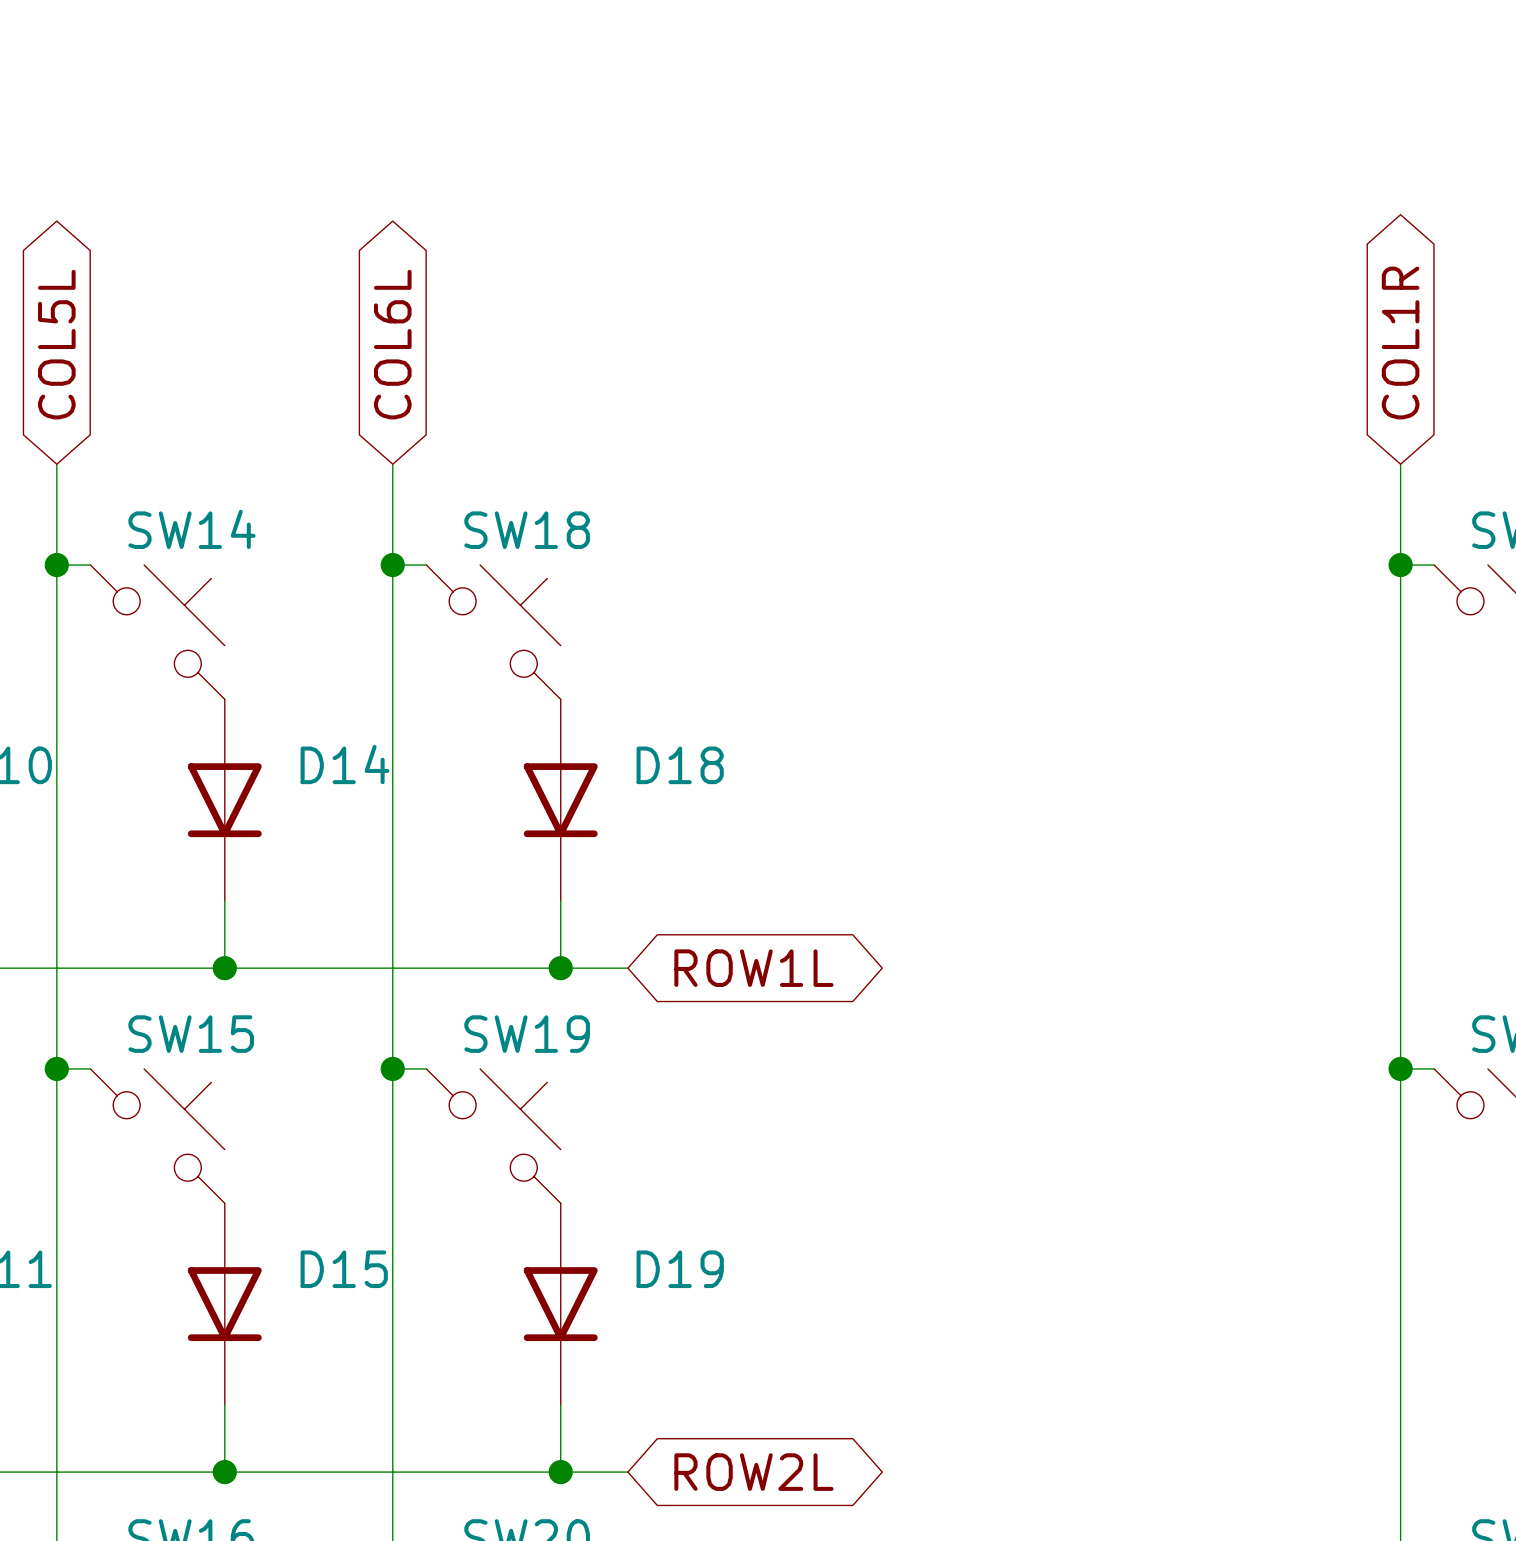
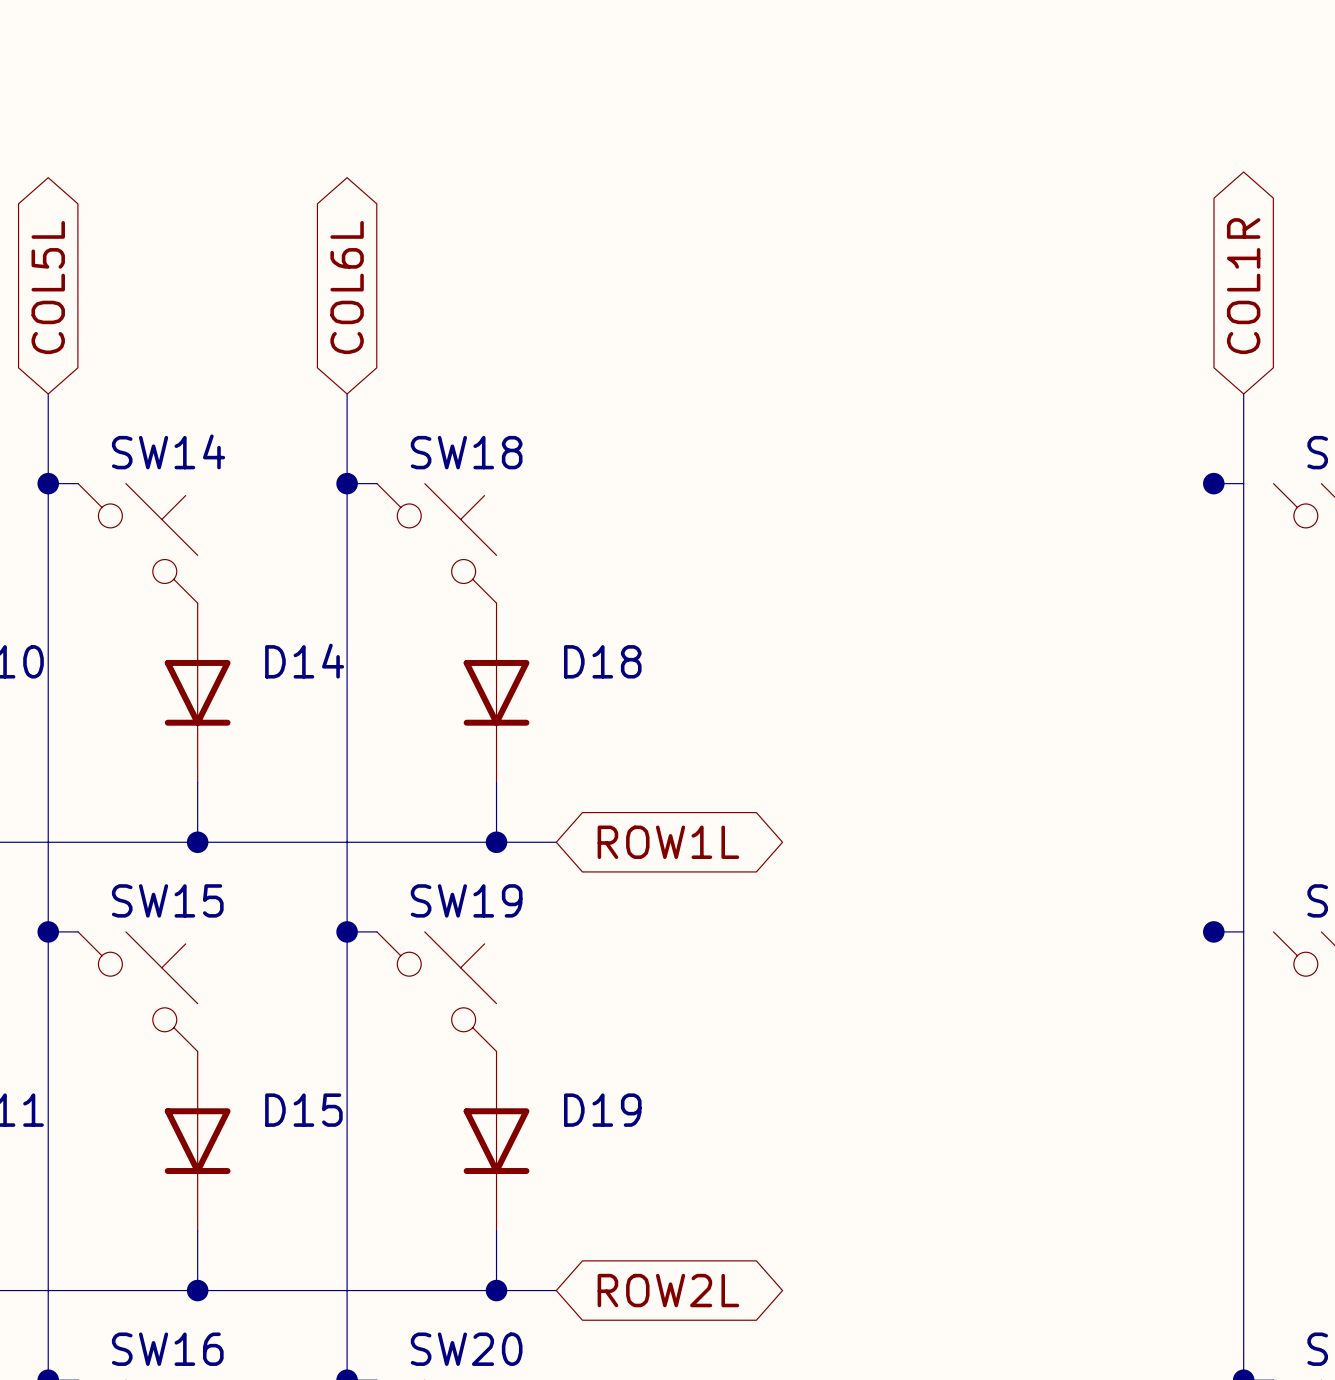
wire: (1400, 565) (1434, 565) -> (1243, 483) (1213, 483)
junction position: (1400, 565) -> (1213, 483)
wire: (1400, 1068) (1434, 1068) -> (1243, 931) (1213, 931)
junction position: (1400, 1068) -> (1213, 931)

